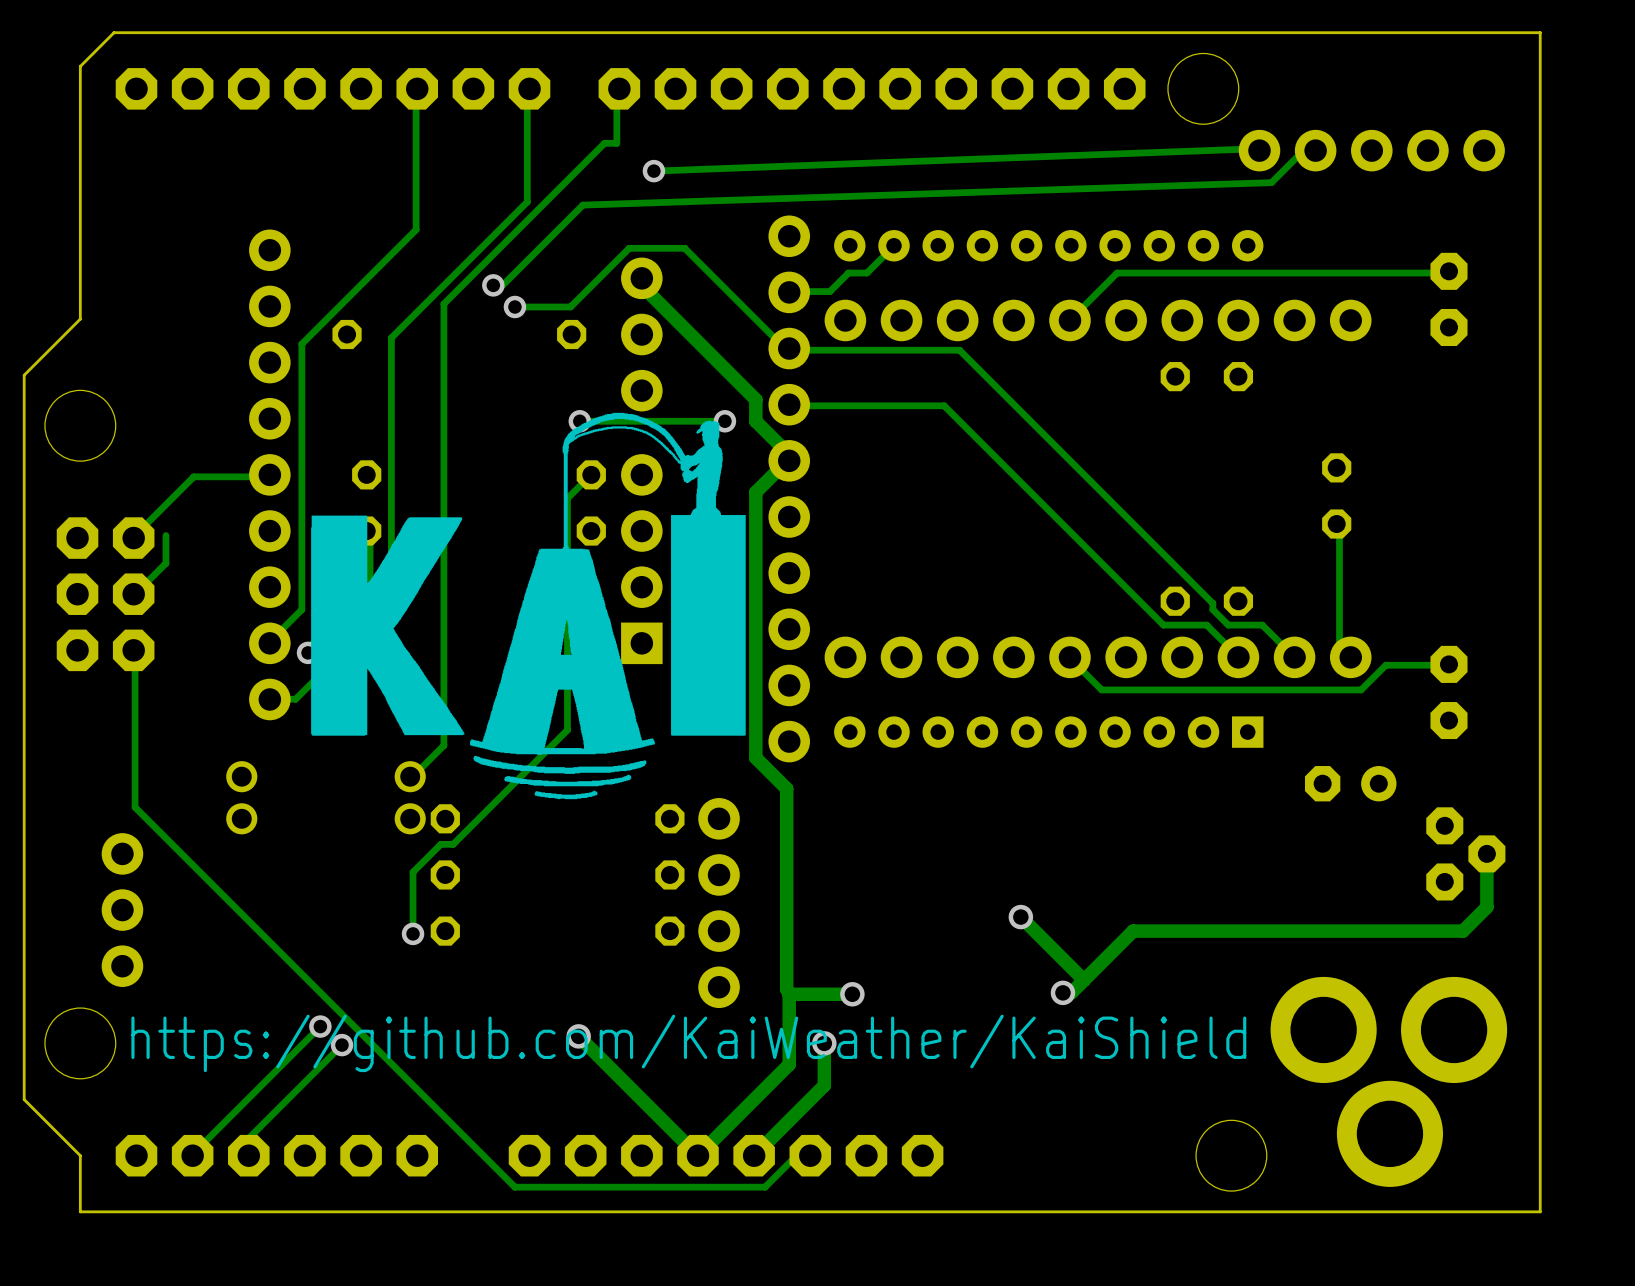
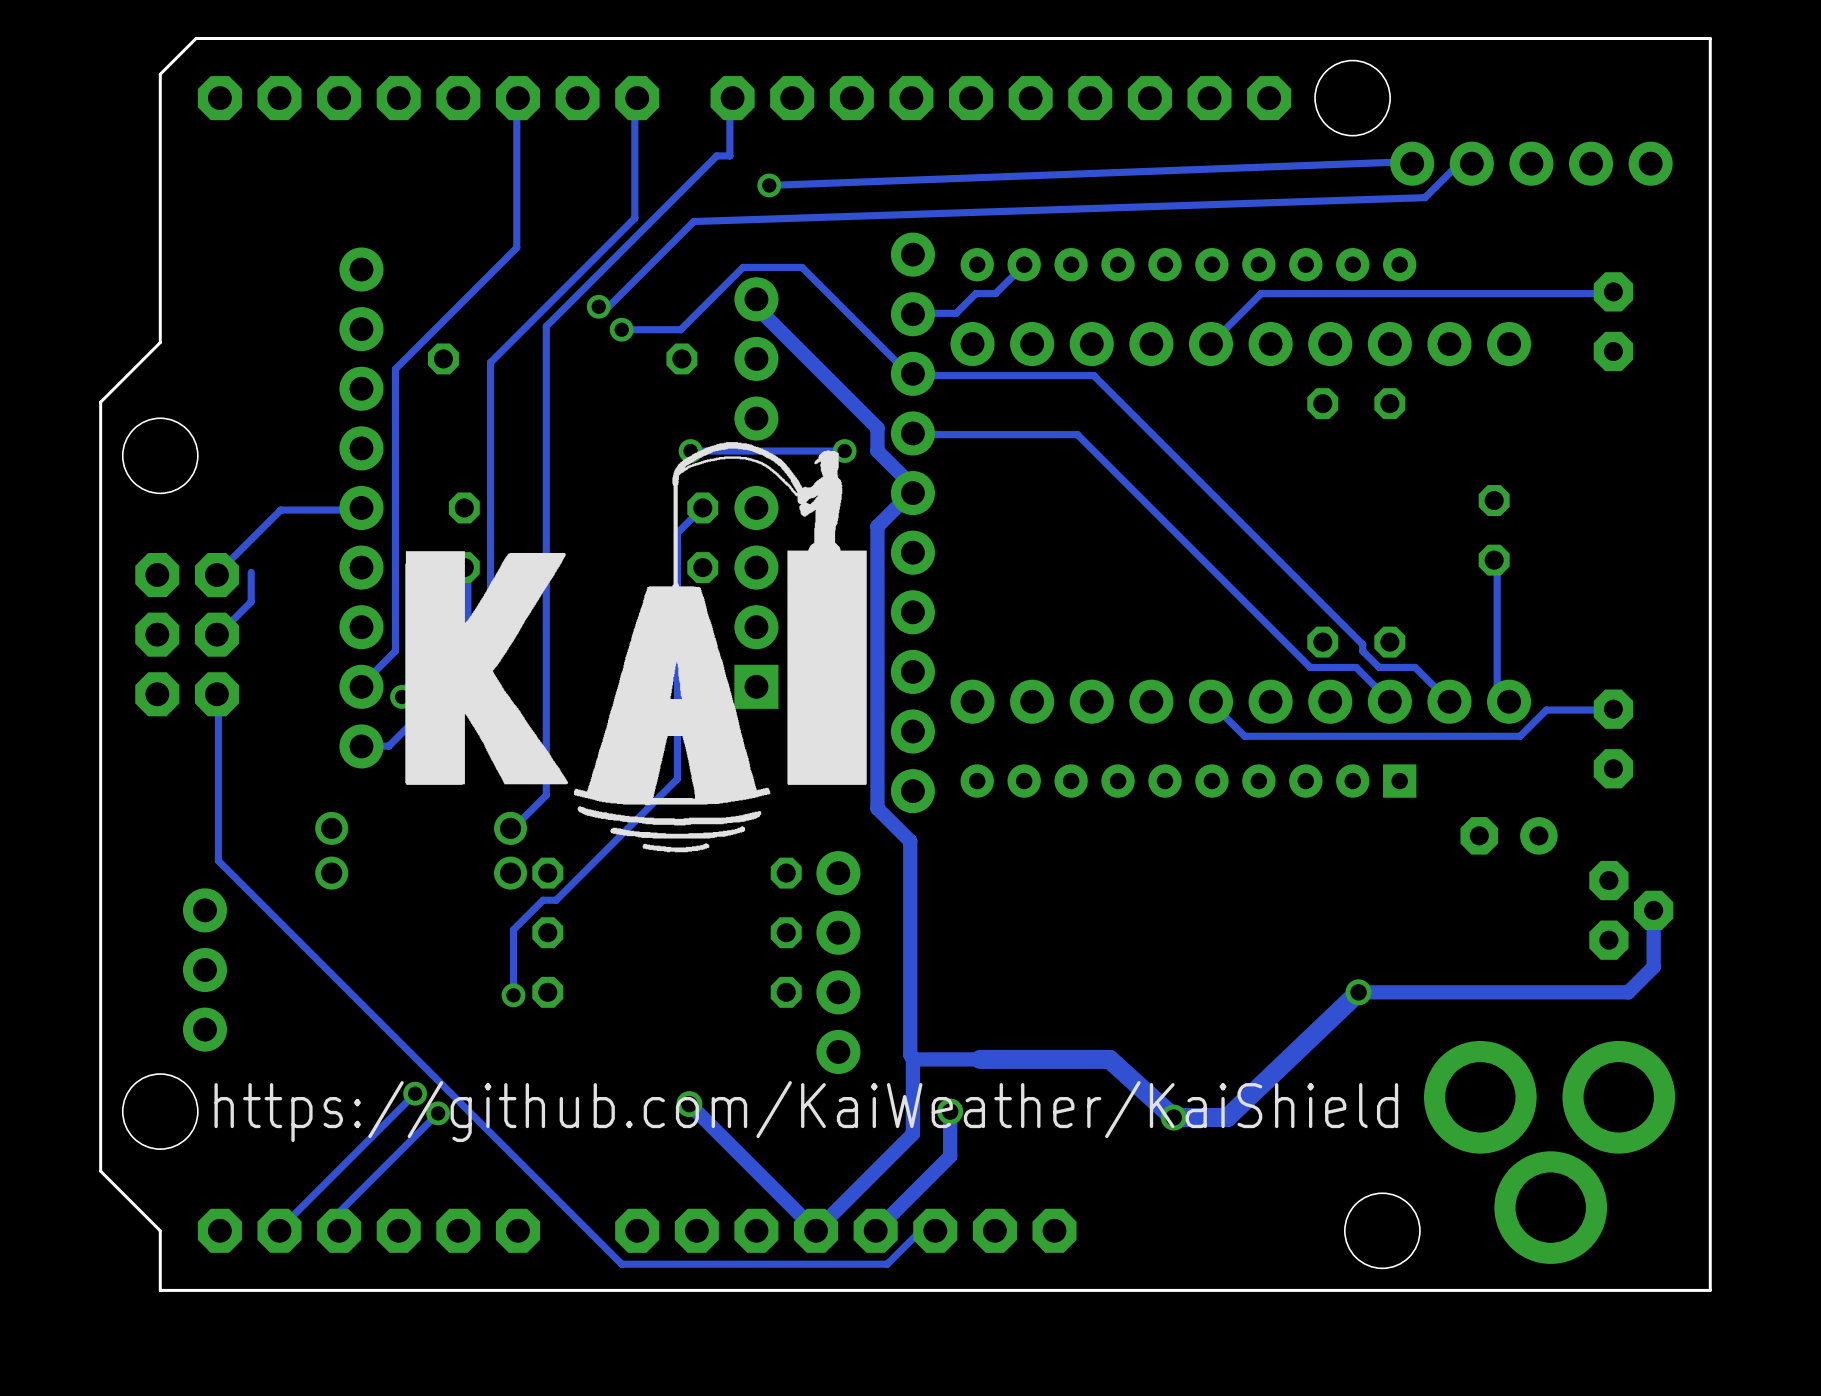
track: (1020, 917) (1084, 980) -> none
via: (1020, 917) -> none
track: (1208, 931) (1133, 931) (1071, 992) (1062, 992) -> (1358, 992) (1227, 1117) (1173, 1117) (1109, 1059) (979, 1059)
via: none -> (1358, 992)
via position: (1062, 992) -> (1173, 1117)
via: (852, 994) -> none

